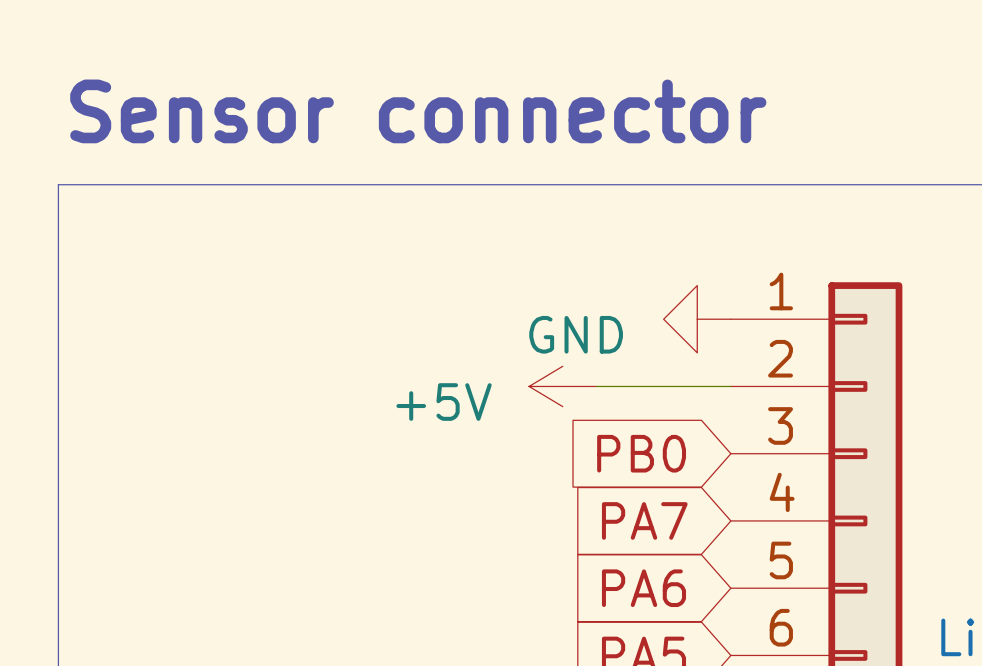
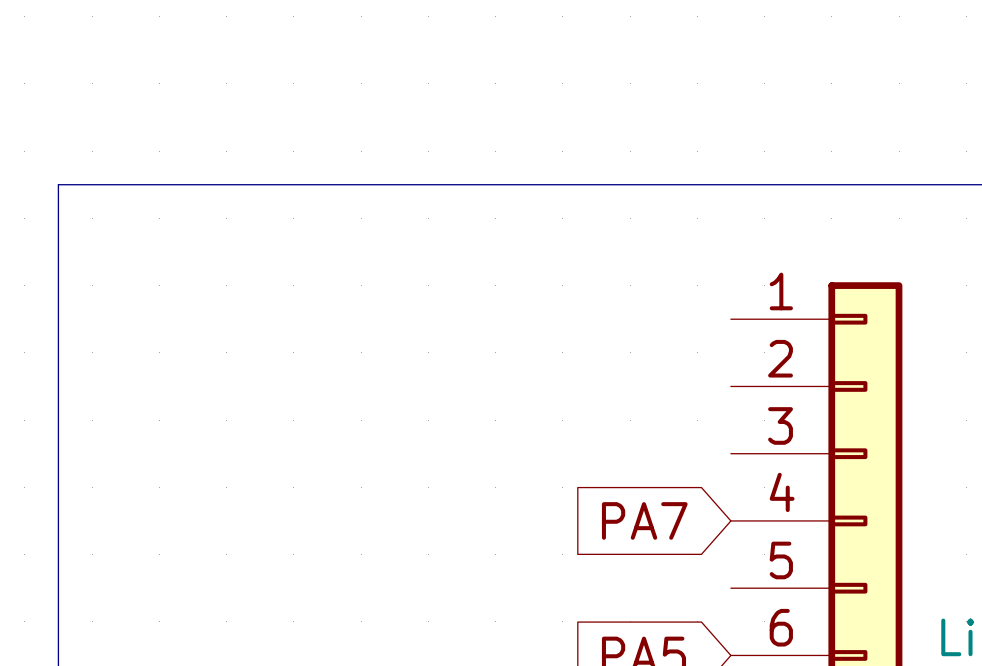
text: Sensor connector (418, 111) -> none
power symbol: GND (697, 319) -> none
power symbol: +5V (562, 386) -> none
wire: (596, 386) (730, 386) -> none
global label: PB0 (641, 453) -> none
global label: PA6 (643, 588) -> none

